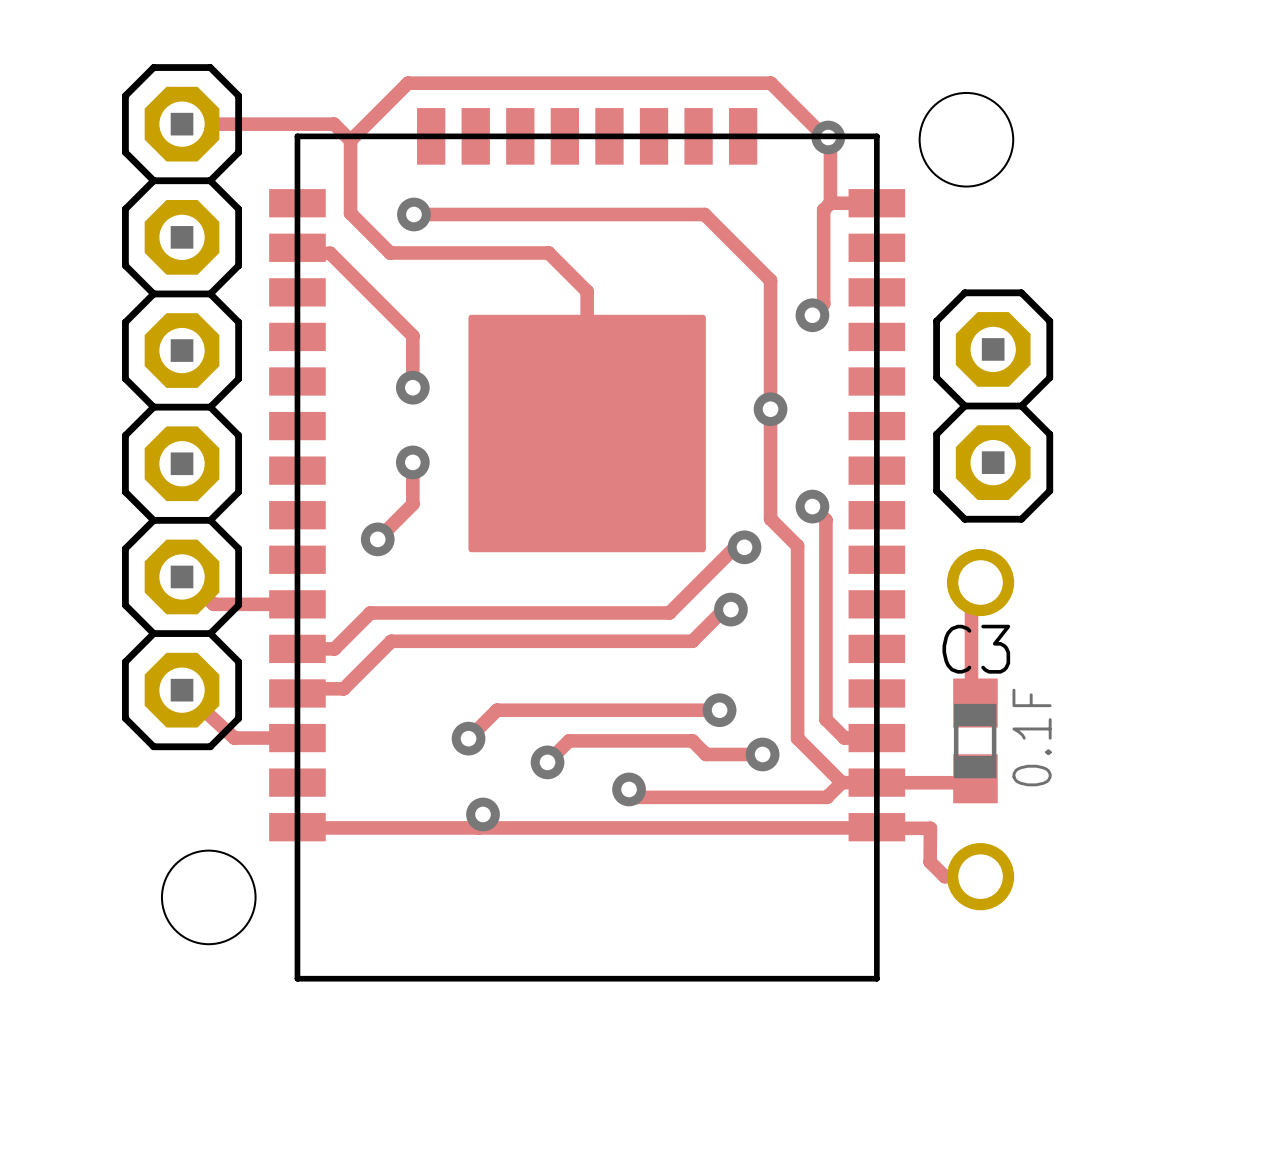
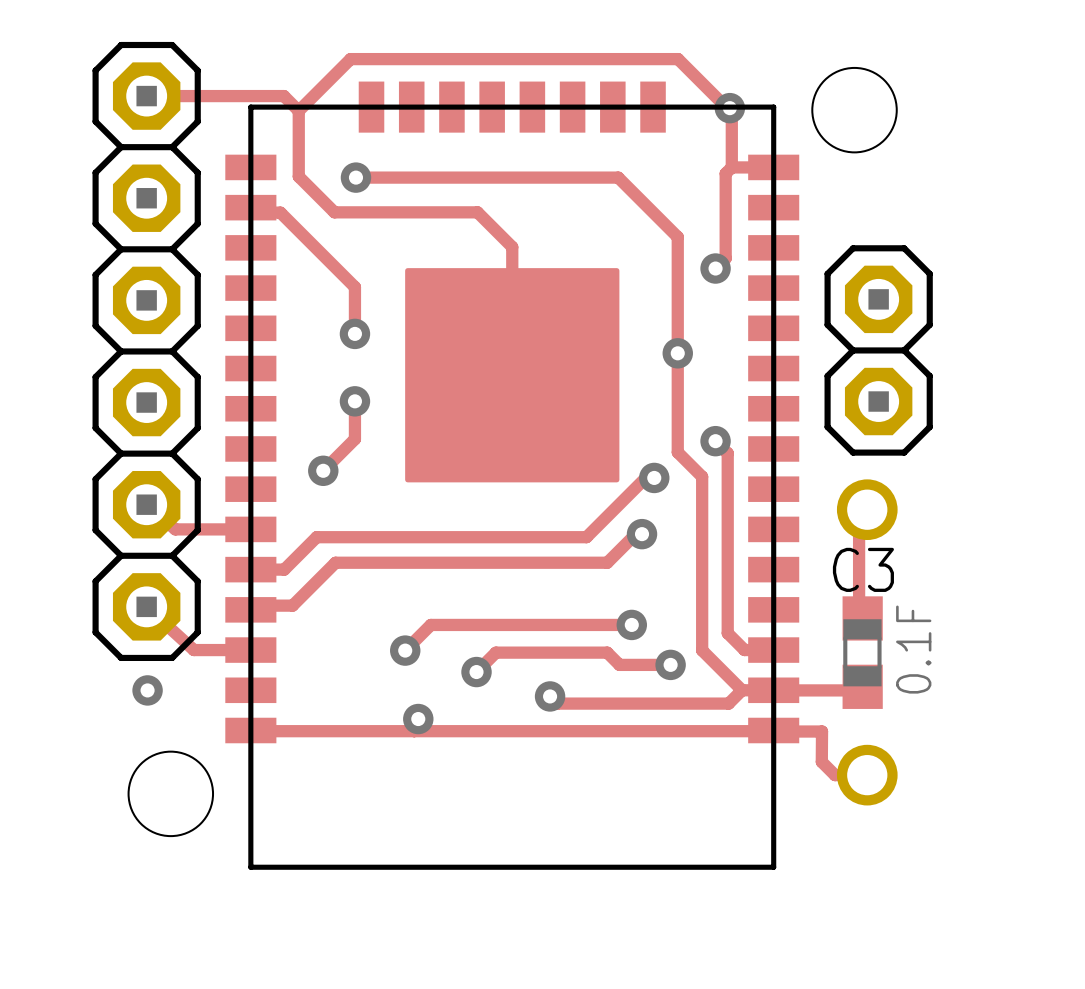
via: none -> (147, 690)

